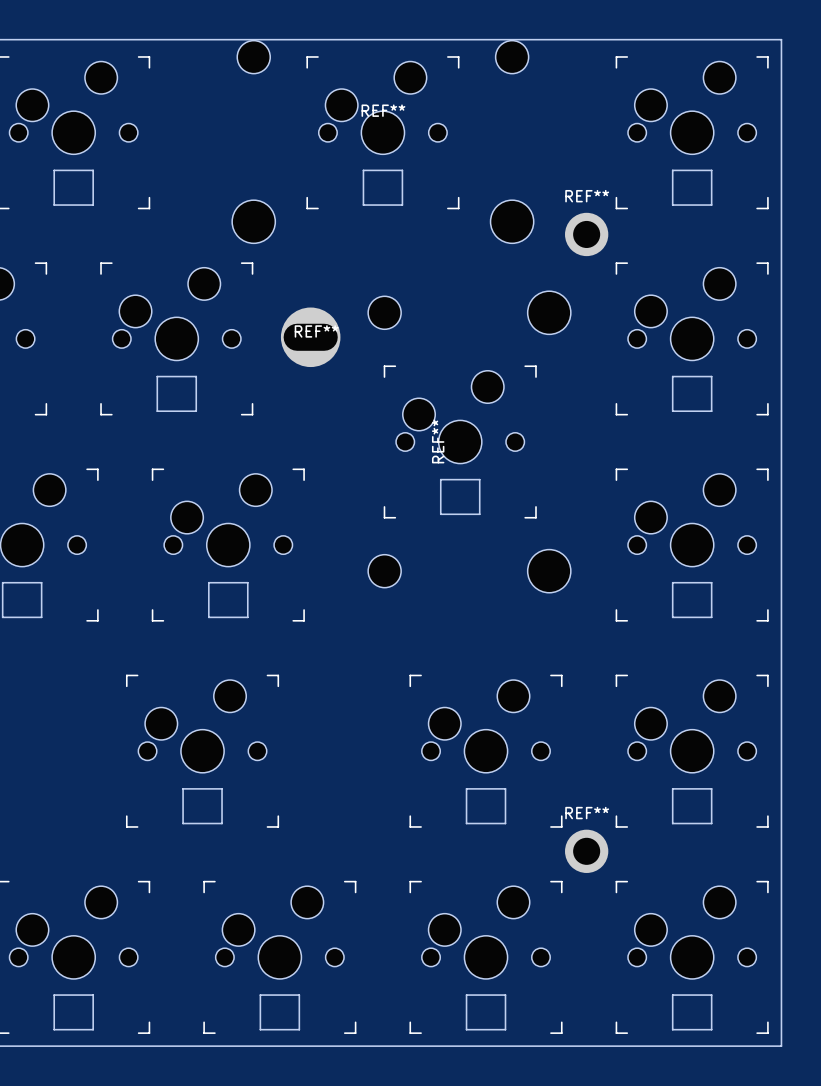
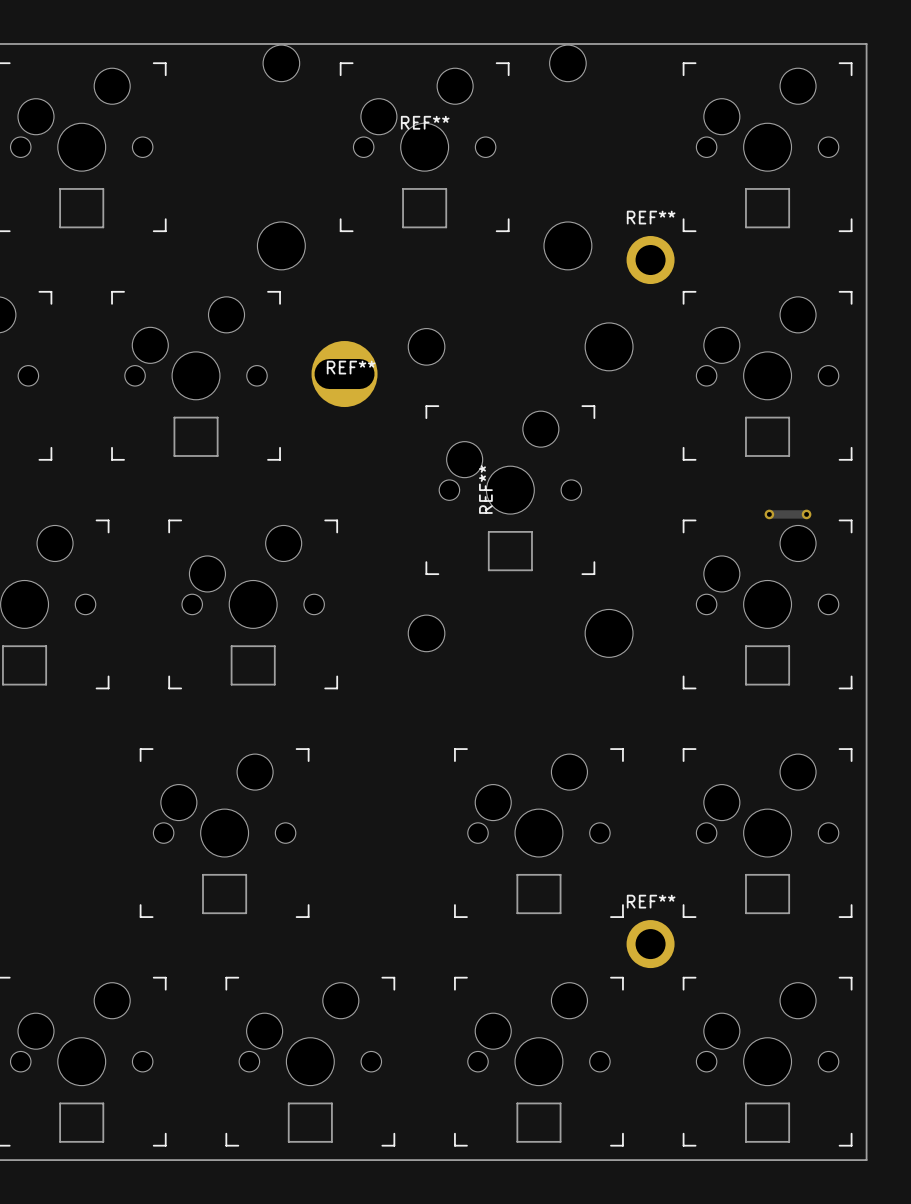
track: none -> (769, 514) (806, 514)
via: none -> (769, 514)
via: none -> (806, 514)

